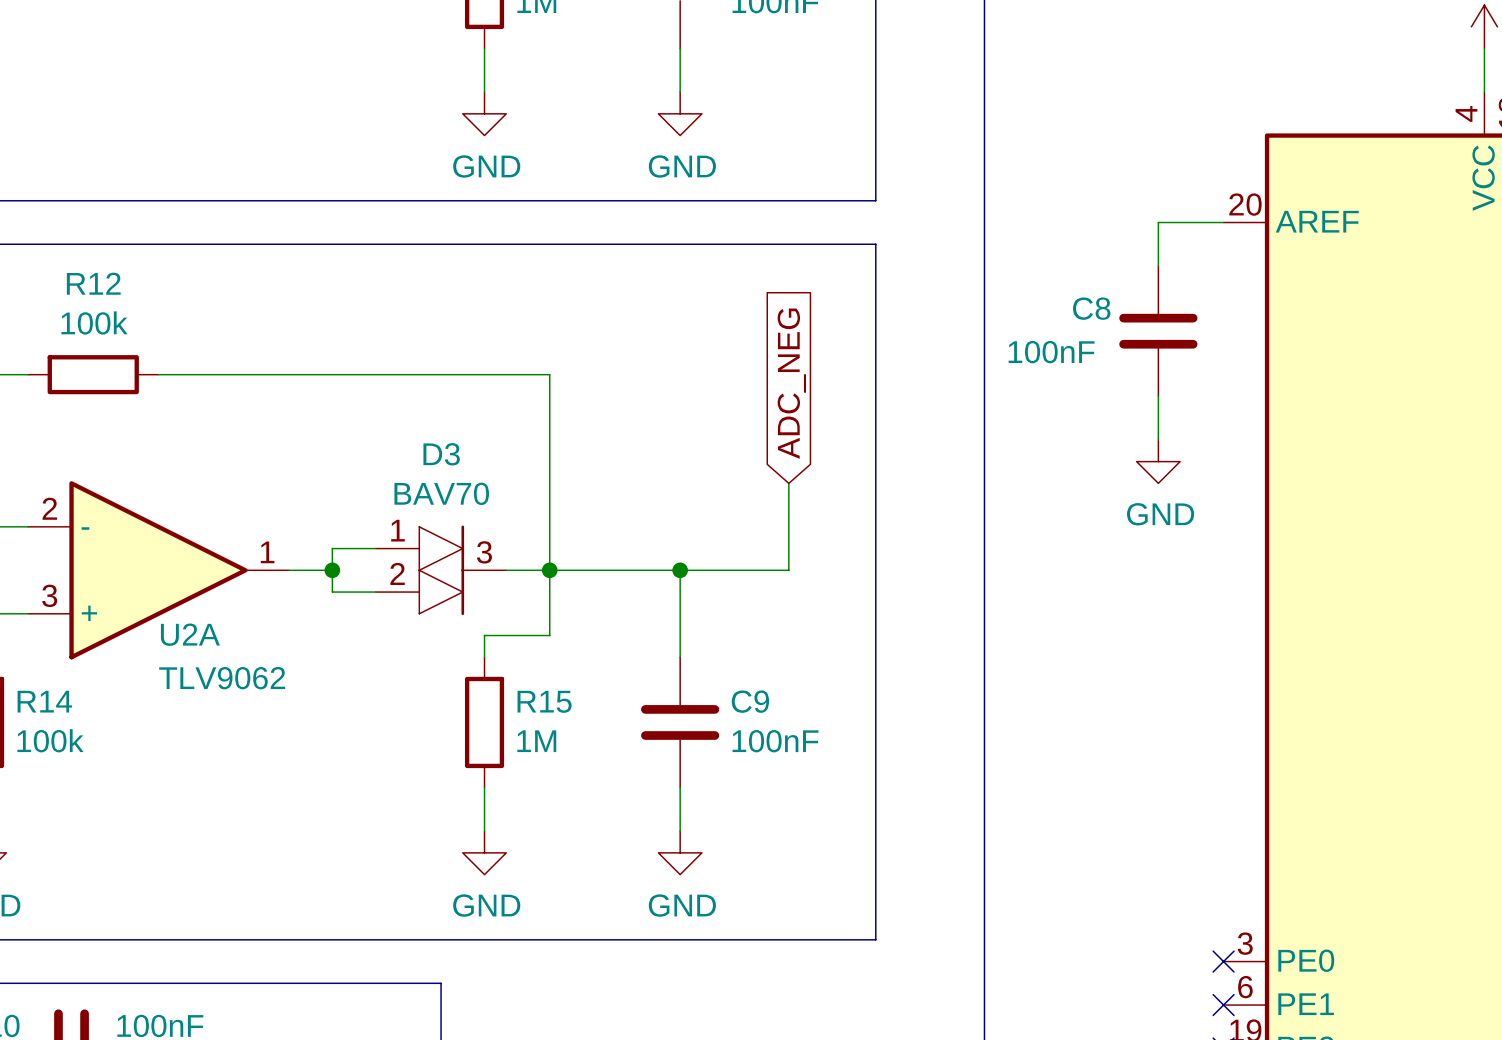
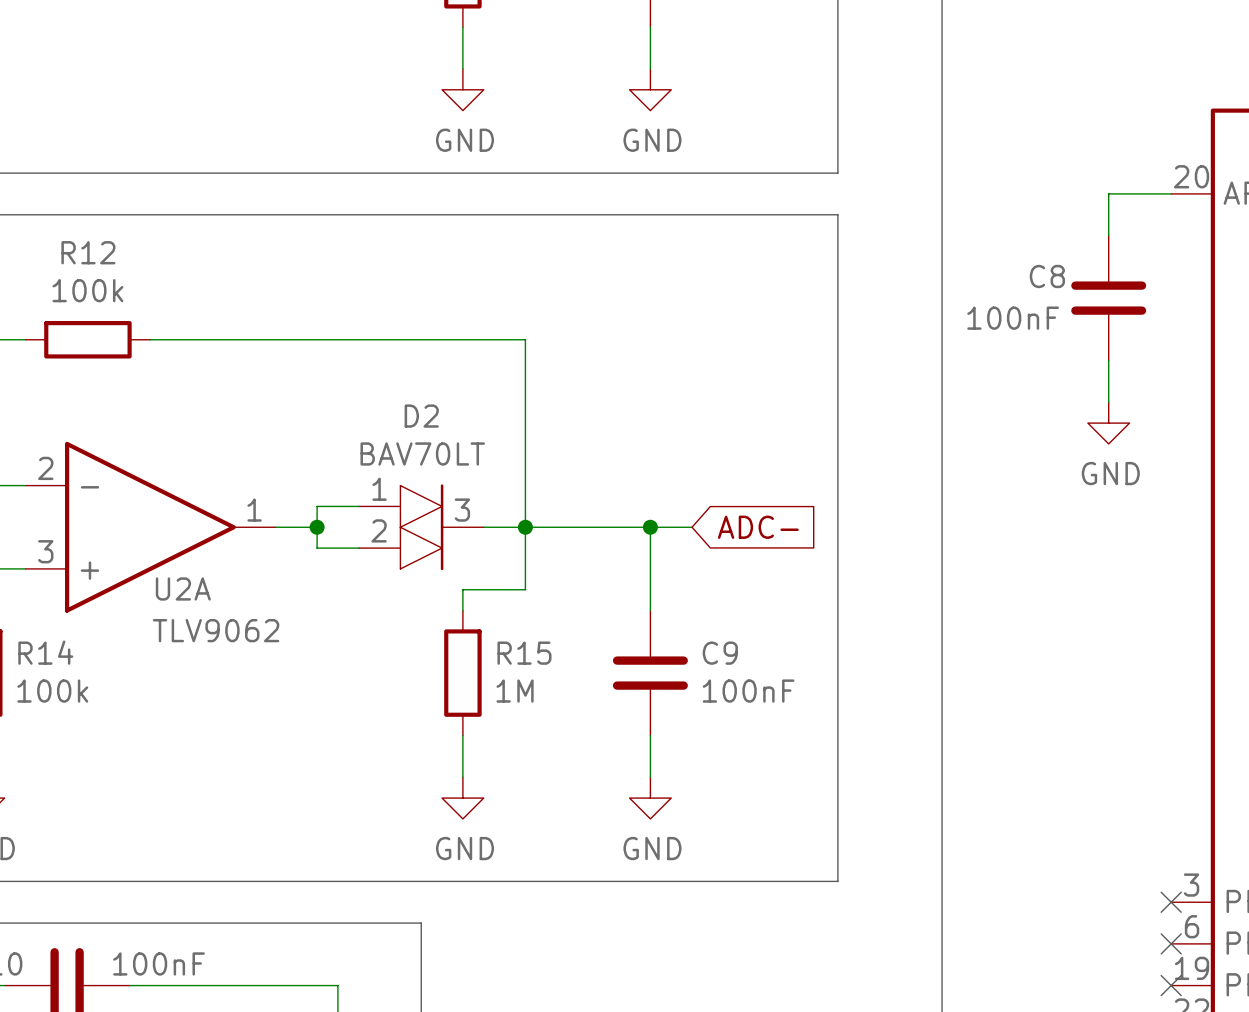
global label: ADC_NEG (791, 383) -> none
D3 name: D3 (441, 454) -> D2 (421, 416)
wire: (788, 483) (788, 570) (723, 570) -> none
D3 value: BAV70 (441, 493) -> BAV70LT (422, 453)
global label: none -> ADC- (758, 527)

